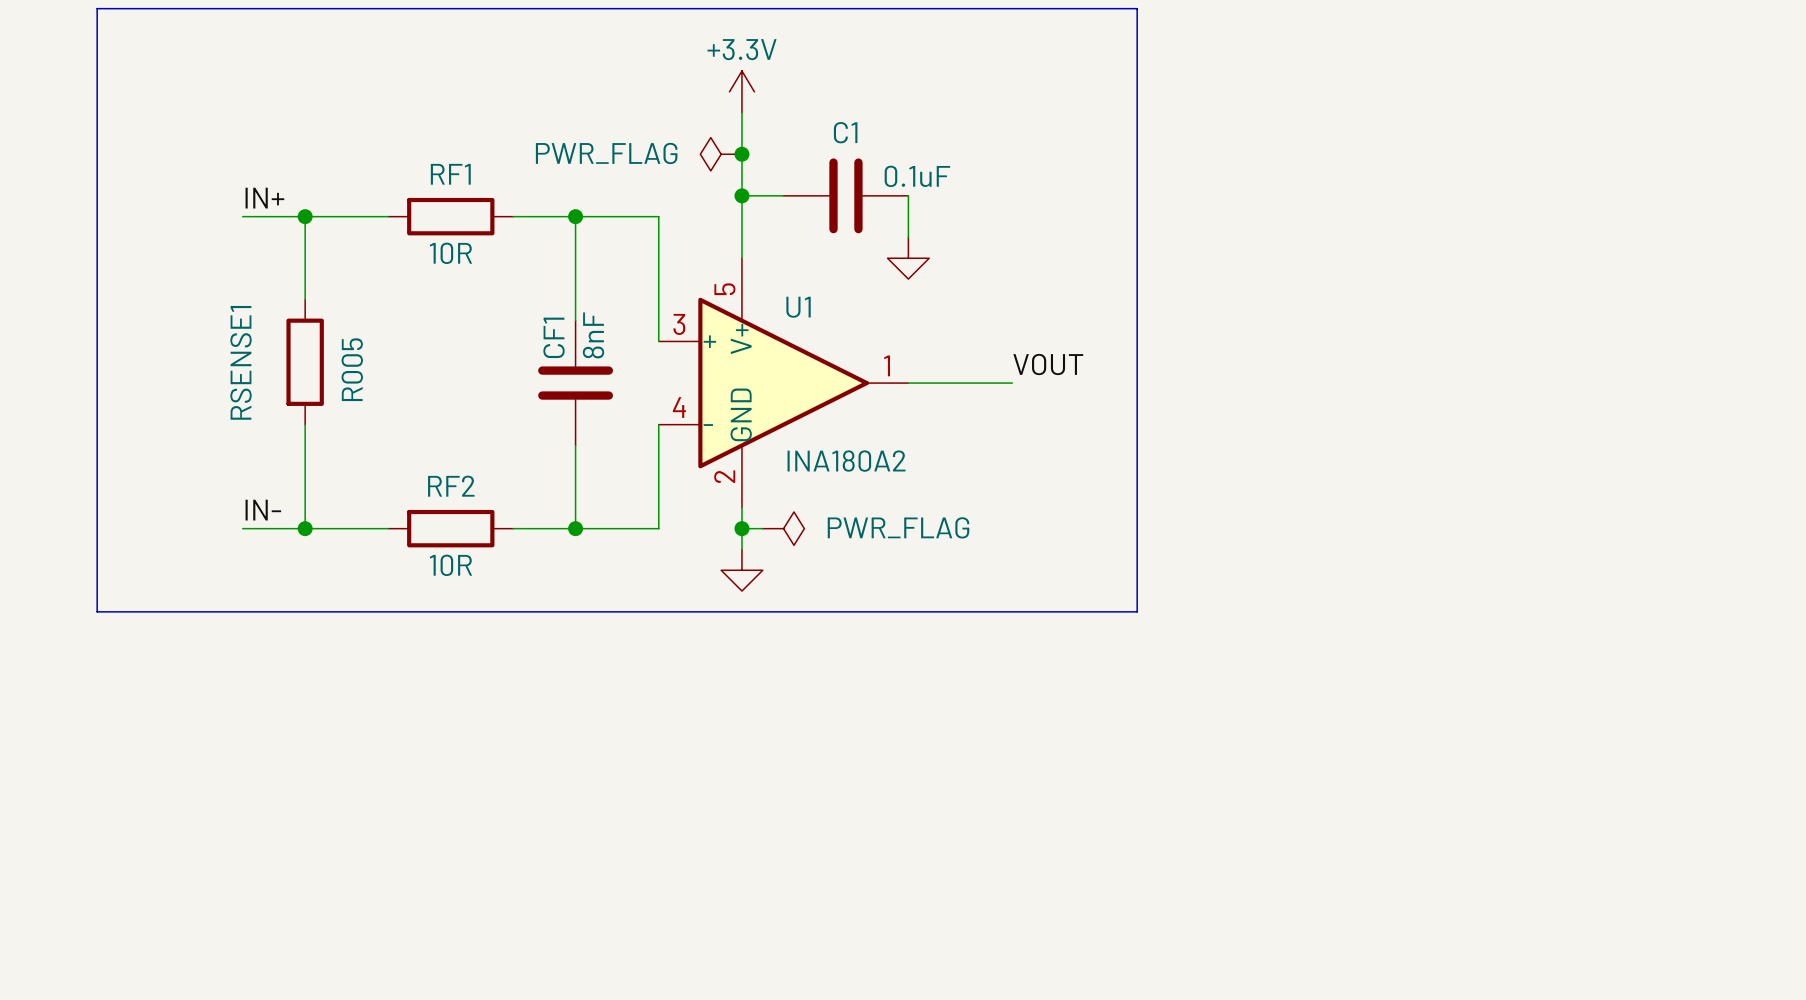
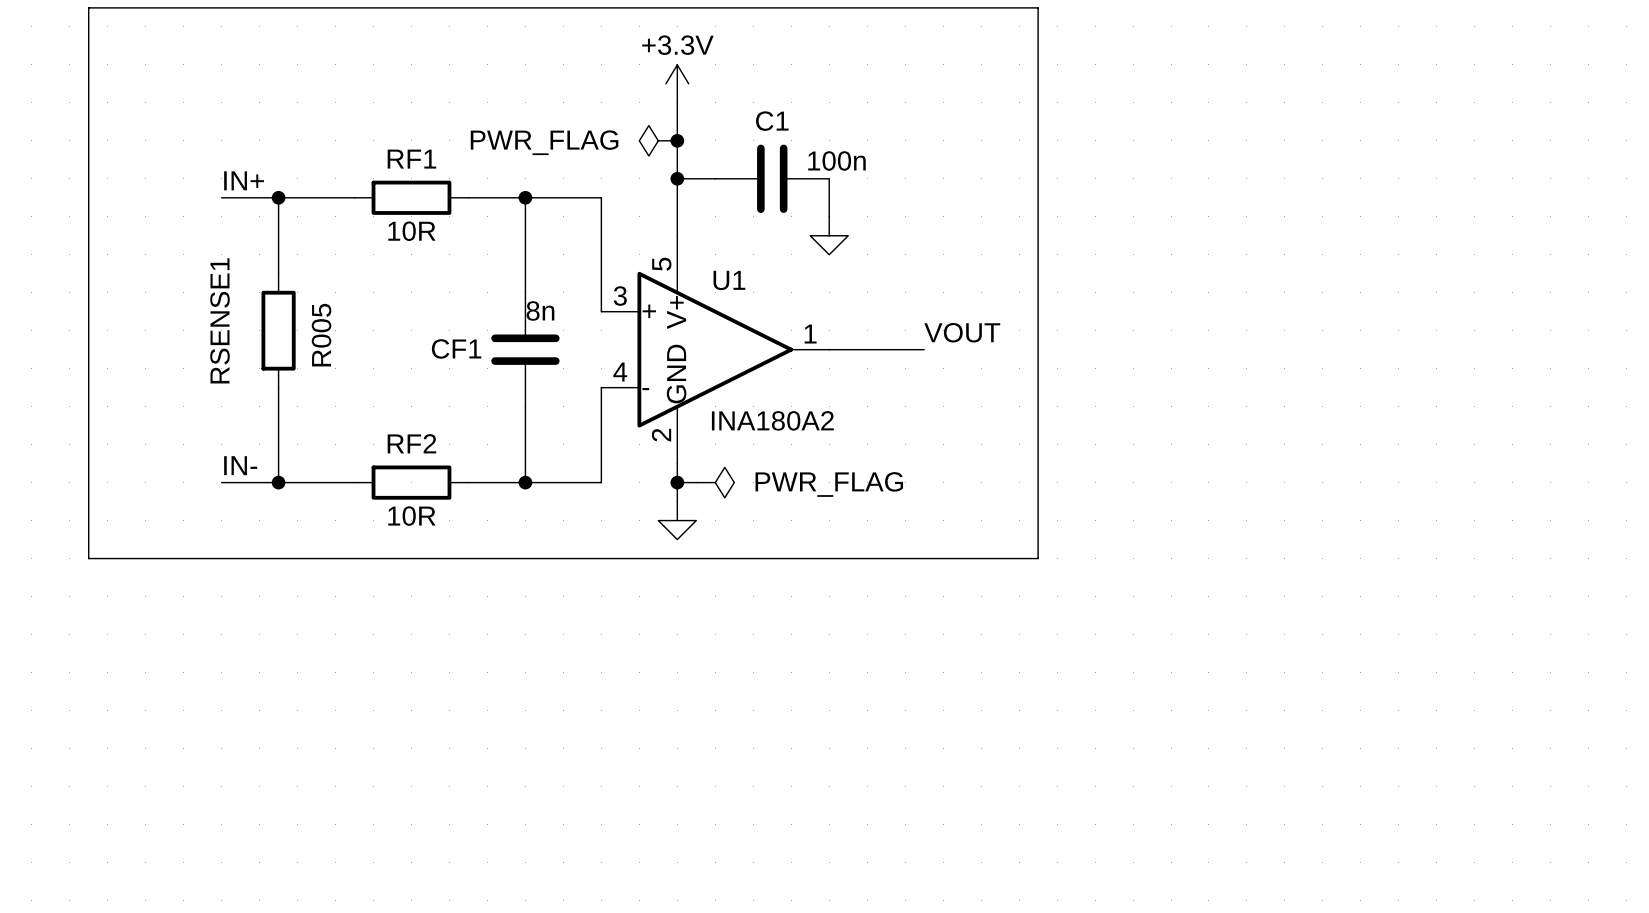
C1 value: 0.1uF (917, 176) -> 100n (836, 160)
CF1 value: 8nF (593, 335) -> 8n (540, 310)
CF1 name rotation: 0° (554, 337) -> 90° clockwise (456, 348)
CF1 name position: CF1 (554, 337) -> CF1 (456, 348)

